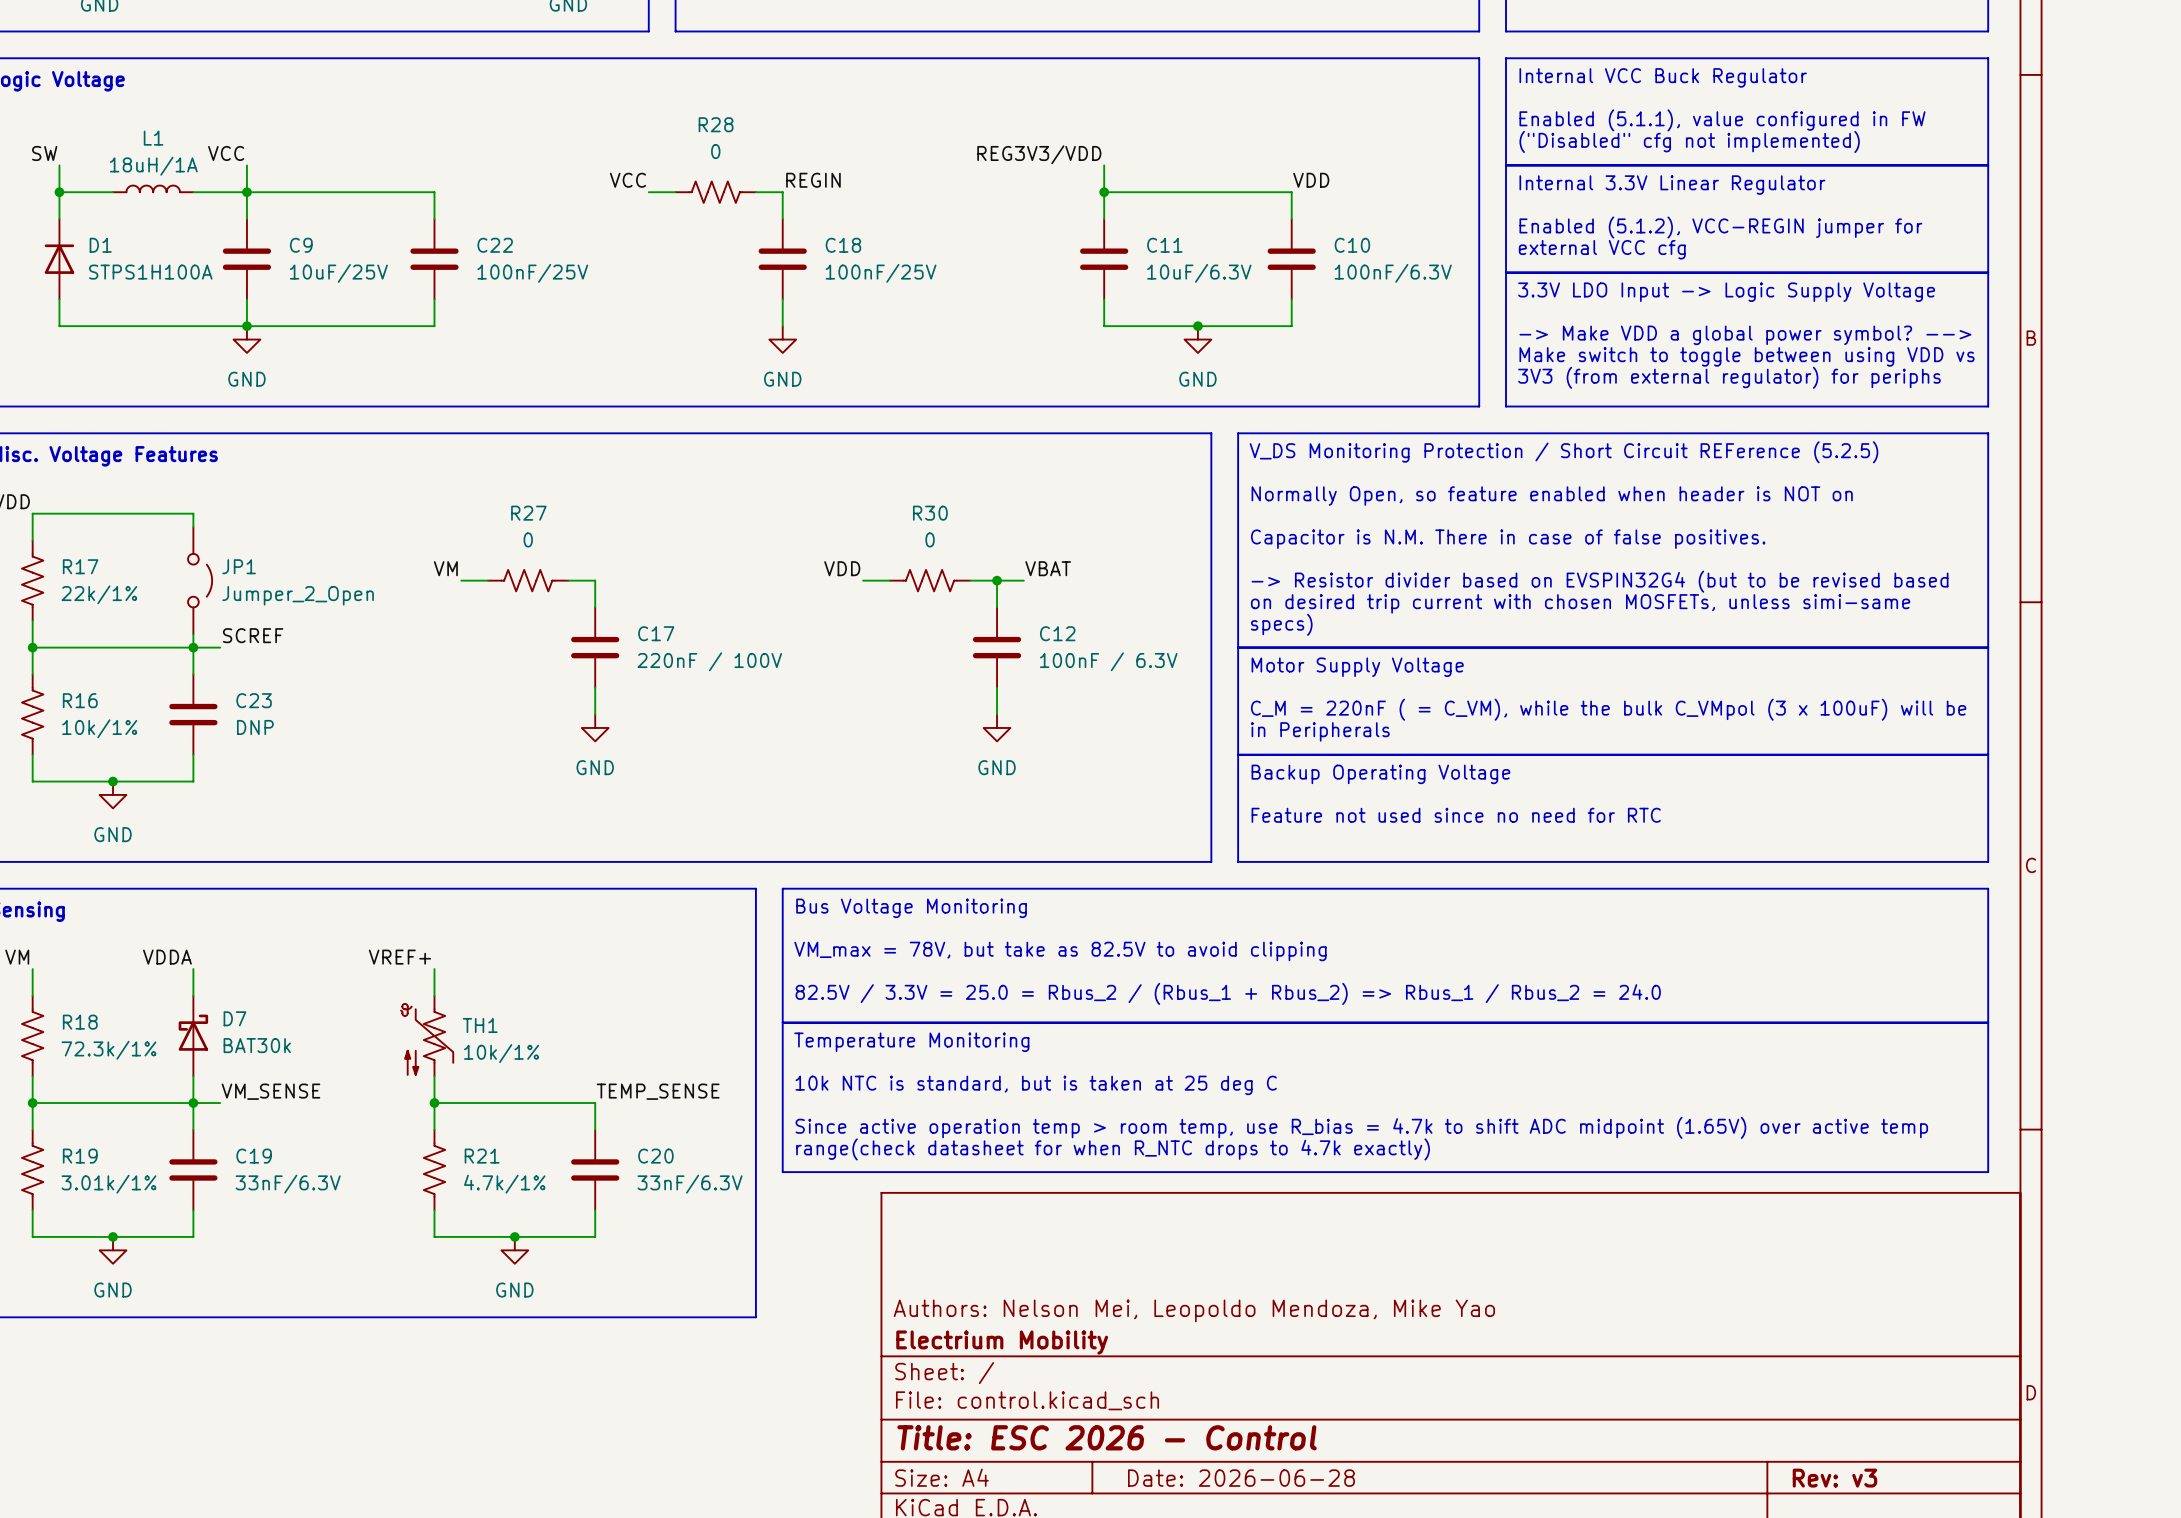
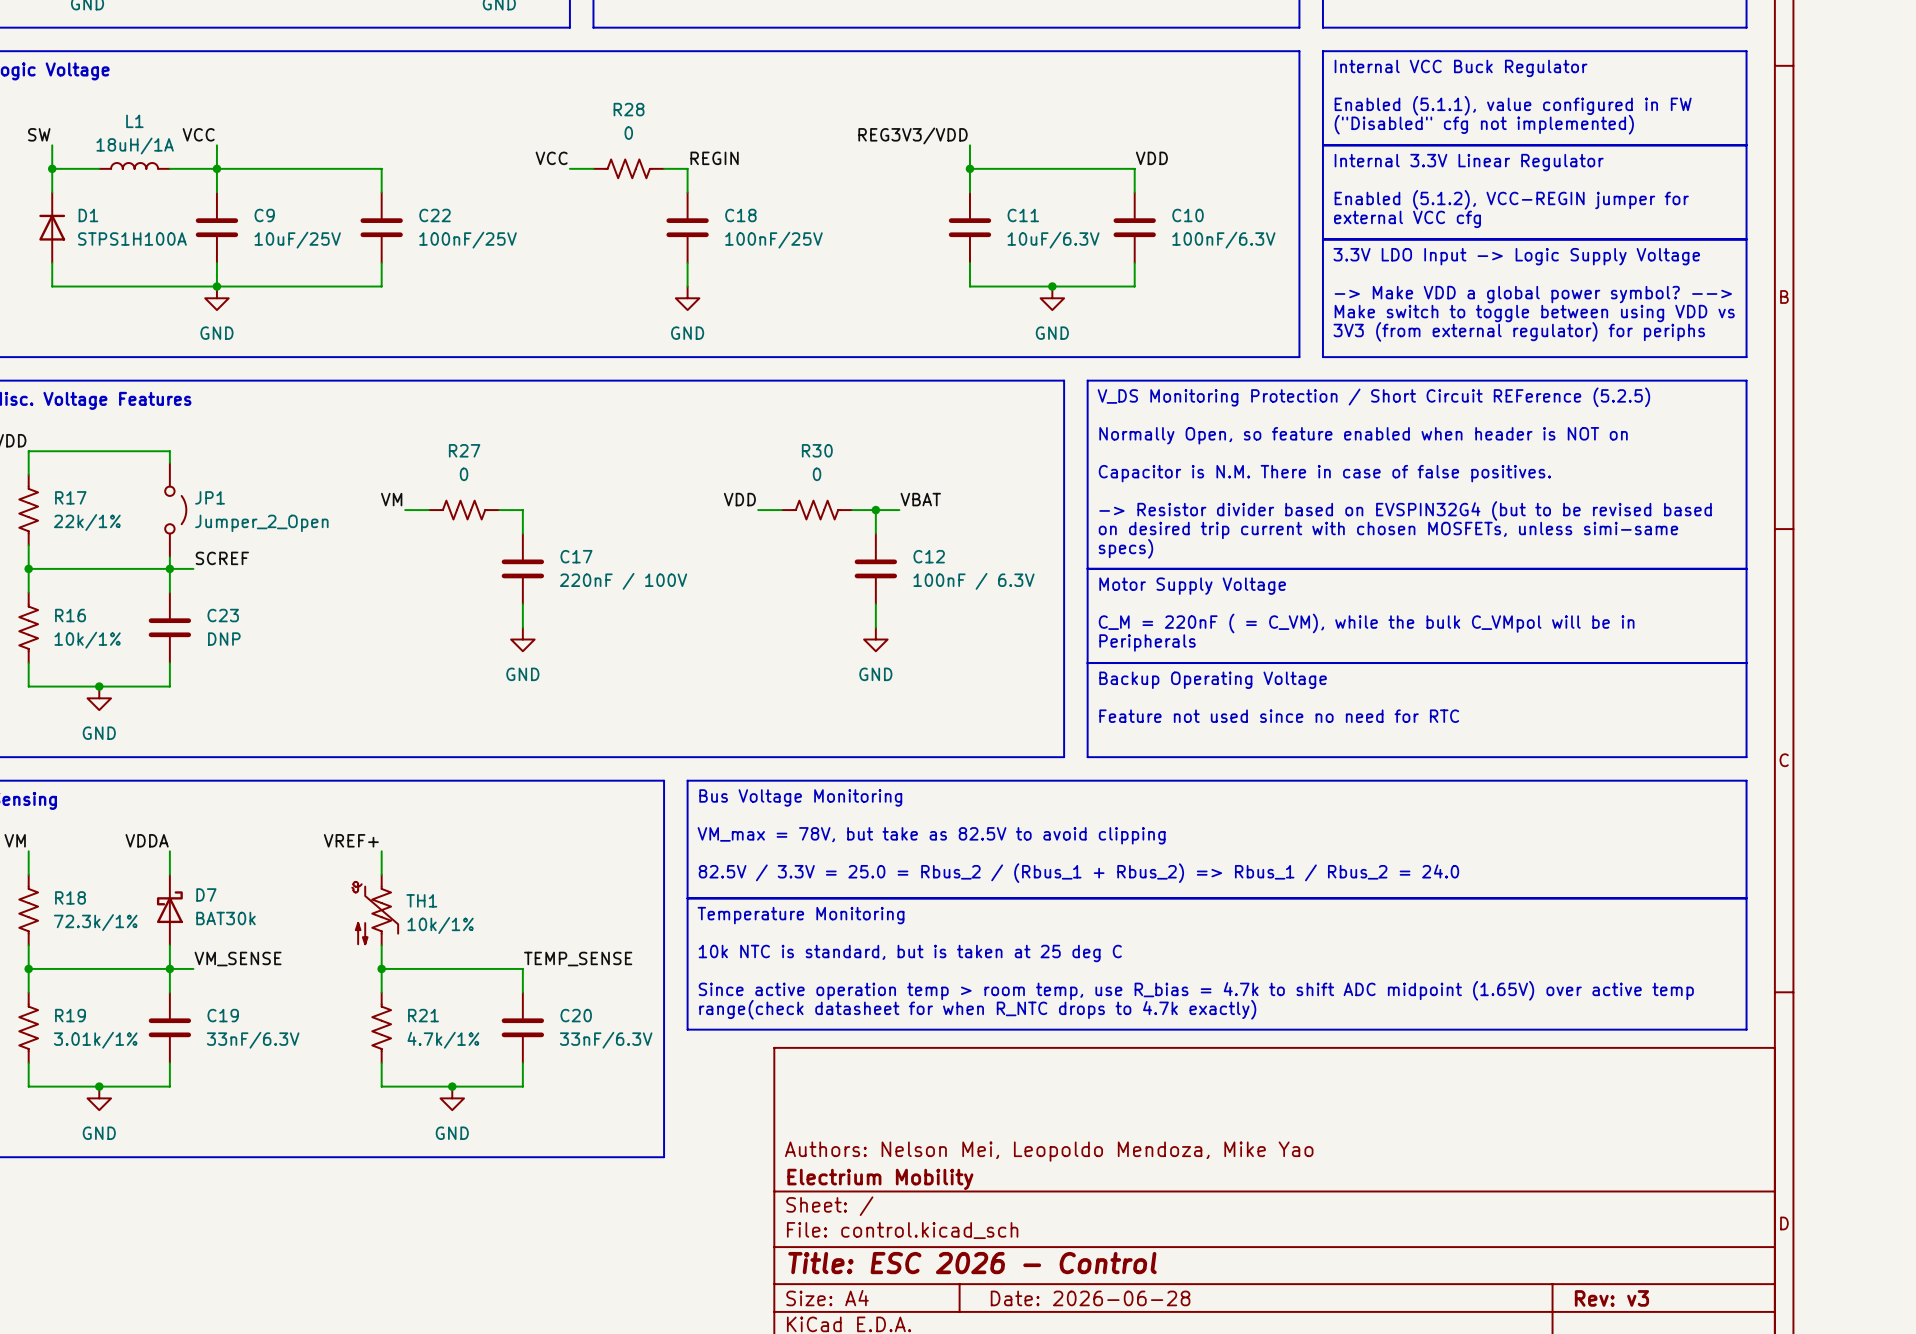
text: C_M = 220nF ( = C_VM), while the bulk C_VMpol (3 x 100uF) will be (1608, 709) -> C_M = 220nF ( = C_VM), while the bulk C_VMpol will be in (1366, 623)
text: in Peripherals (1320, 731) -> Peripherals (1147, 642)

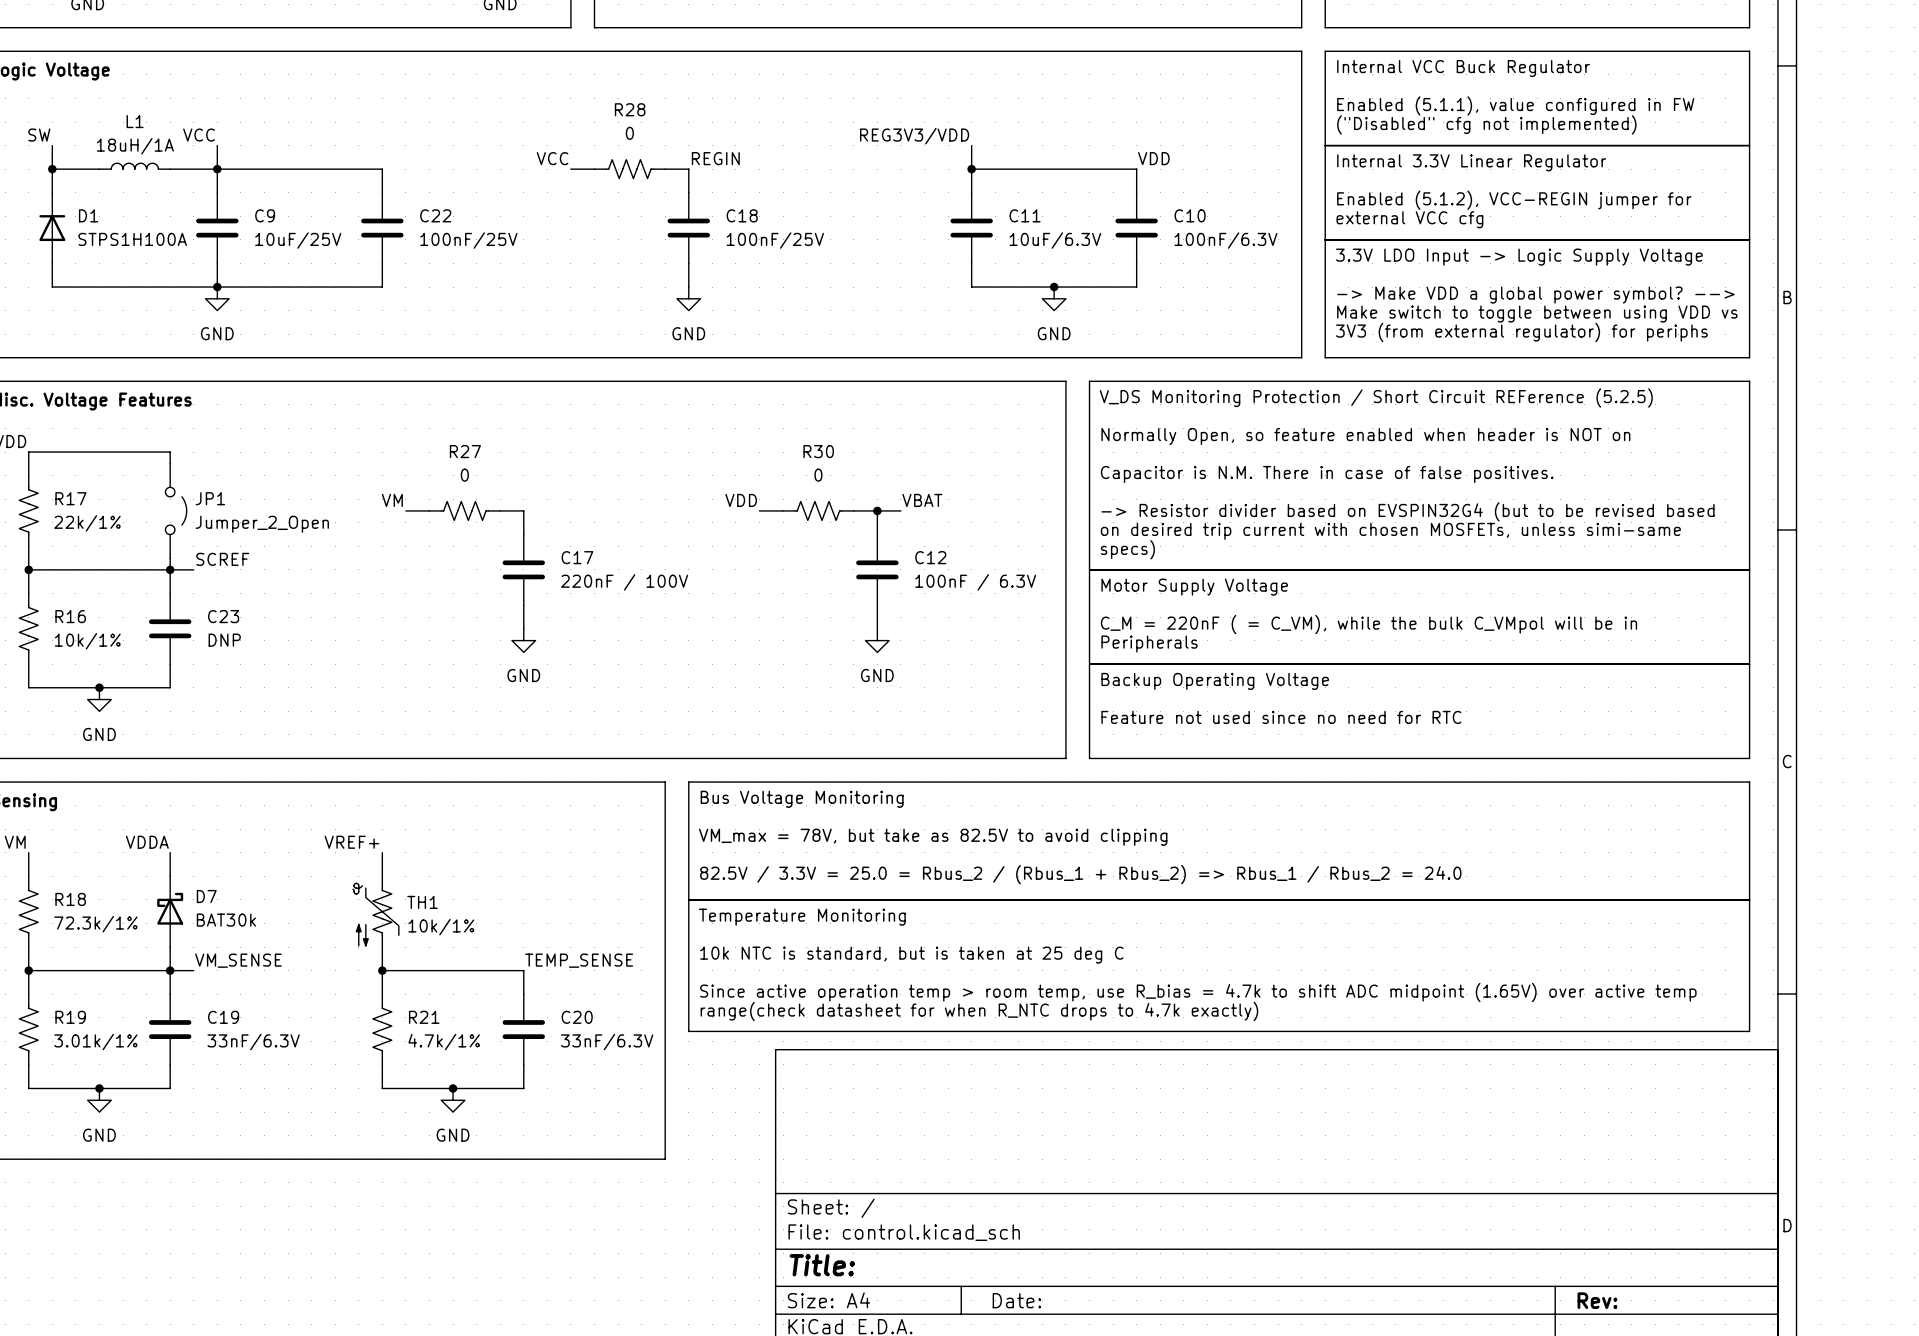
title block: Authors: Nelson Mei, Leopoldo Mendoza, Mike Yao (1049, 1151) -> none
title block: Electrium Mobility (880, 1179) -> none
title block: Title: ESC 2026 - Control (972, 1263) -> Title: (822, 1265)
title block: Date: 2026-06-28 (1090, 1298) -> Date: (1016, 1300)
title block: Rev: v3 (1611, 1298) -> Rev: (1597, 1300)

